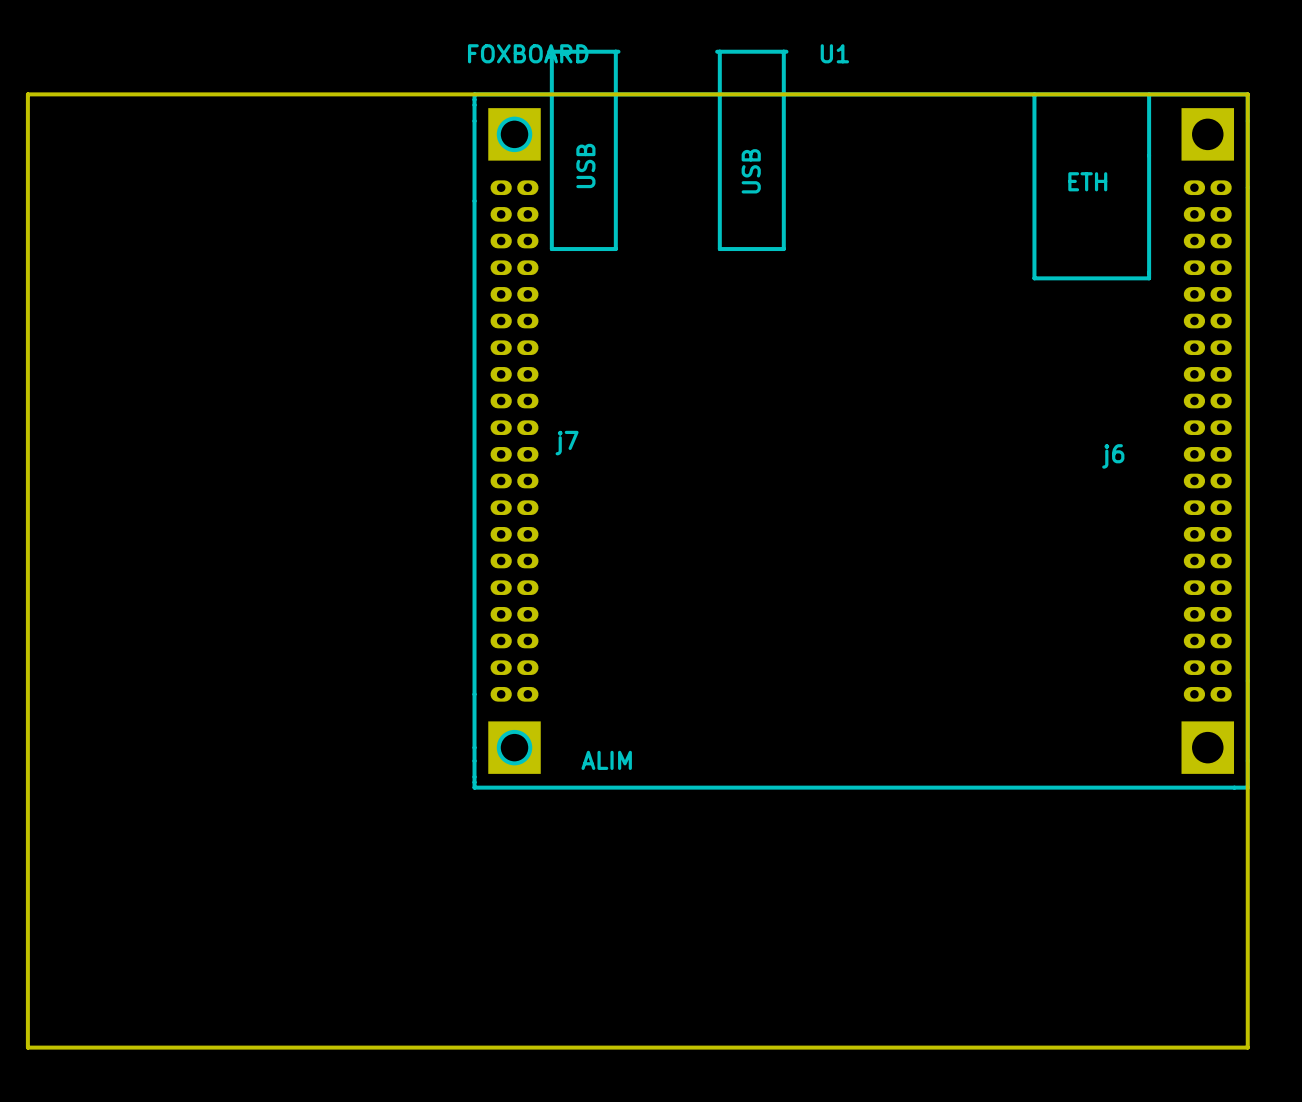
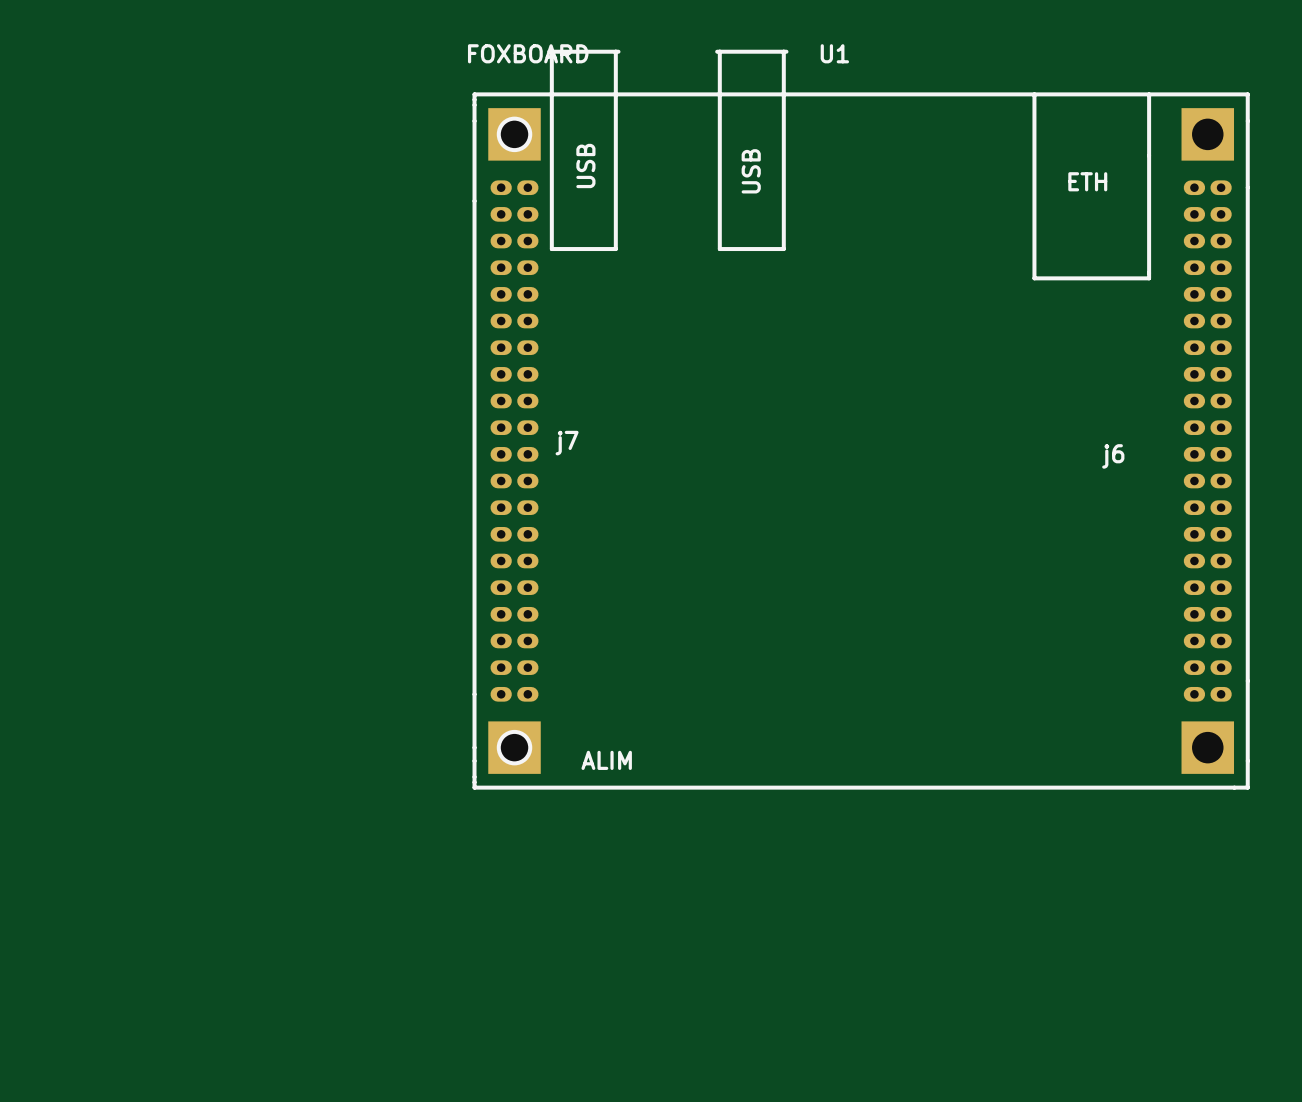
board edge: (27, 94) (27, 1047) (1247, 1047) (1247, 94) (27, 94) -> none

